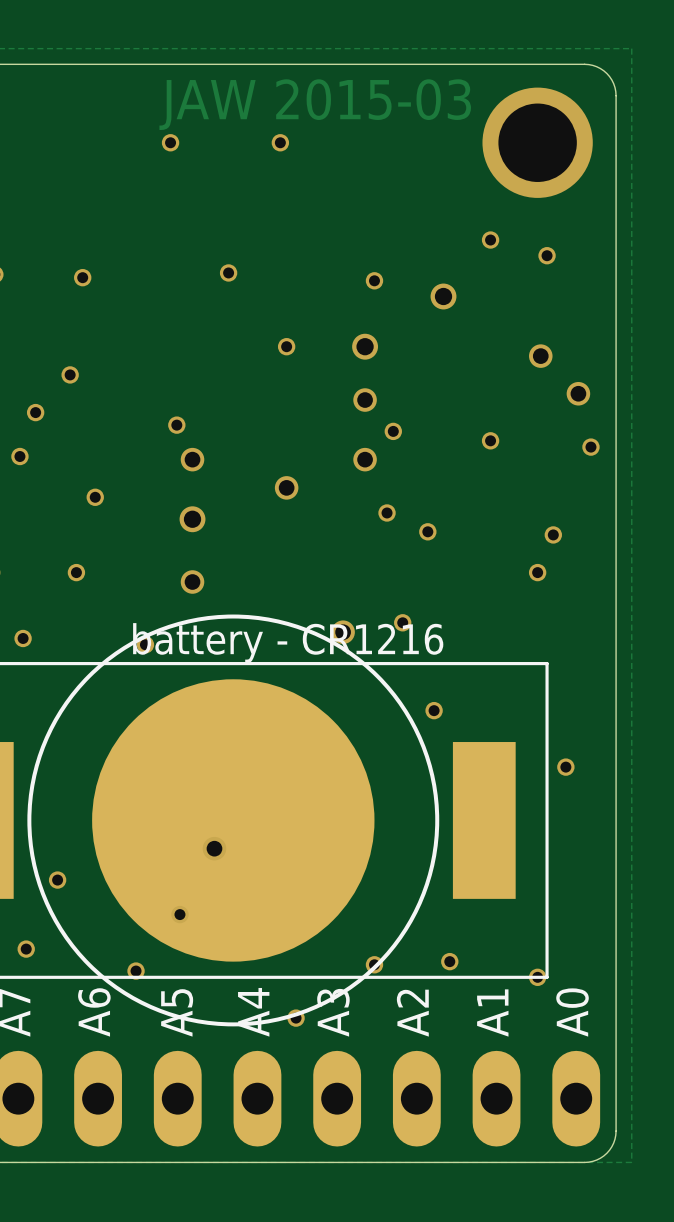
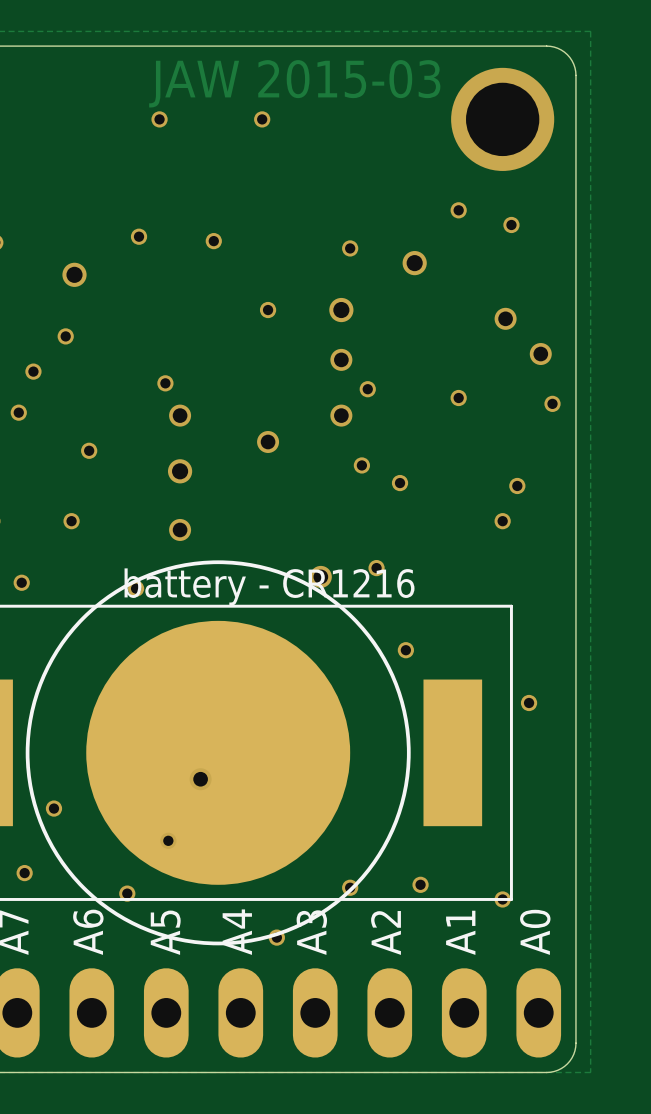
via position: (82, 277) -> (139, 236)
via: none -> (74, 274)

